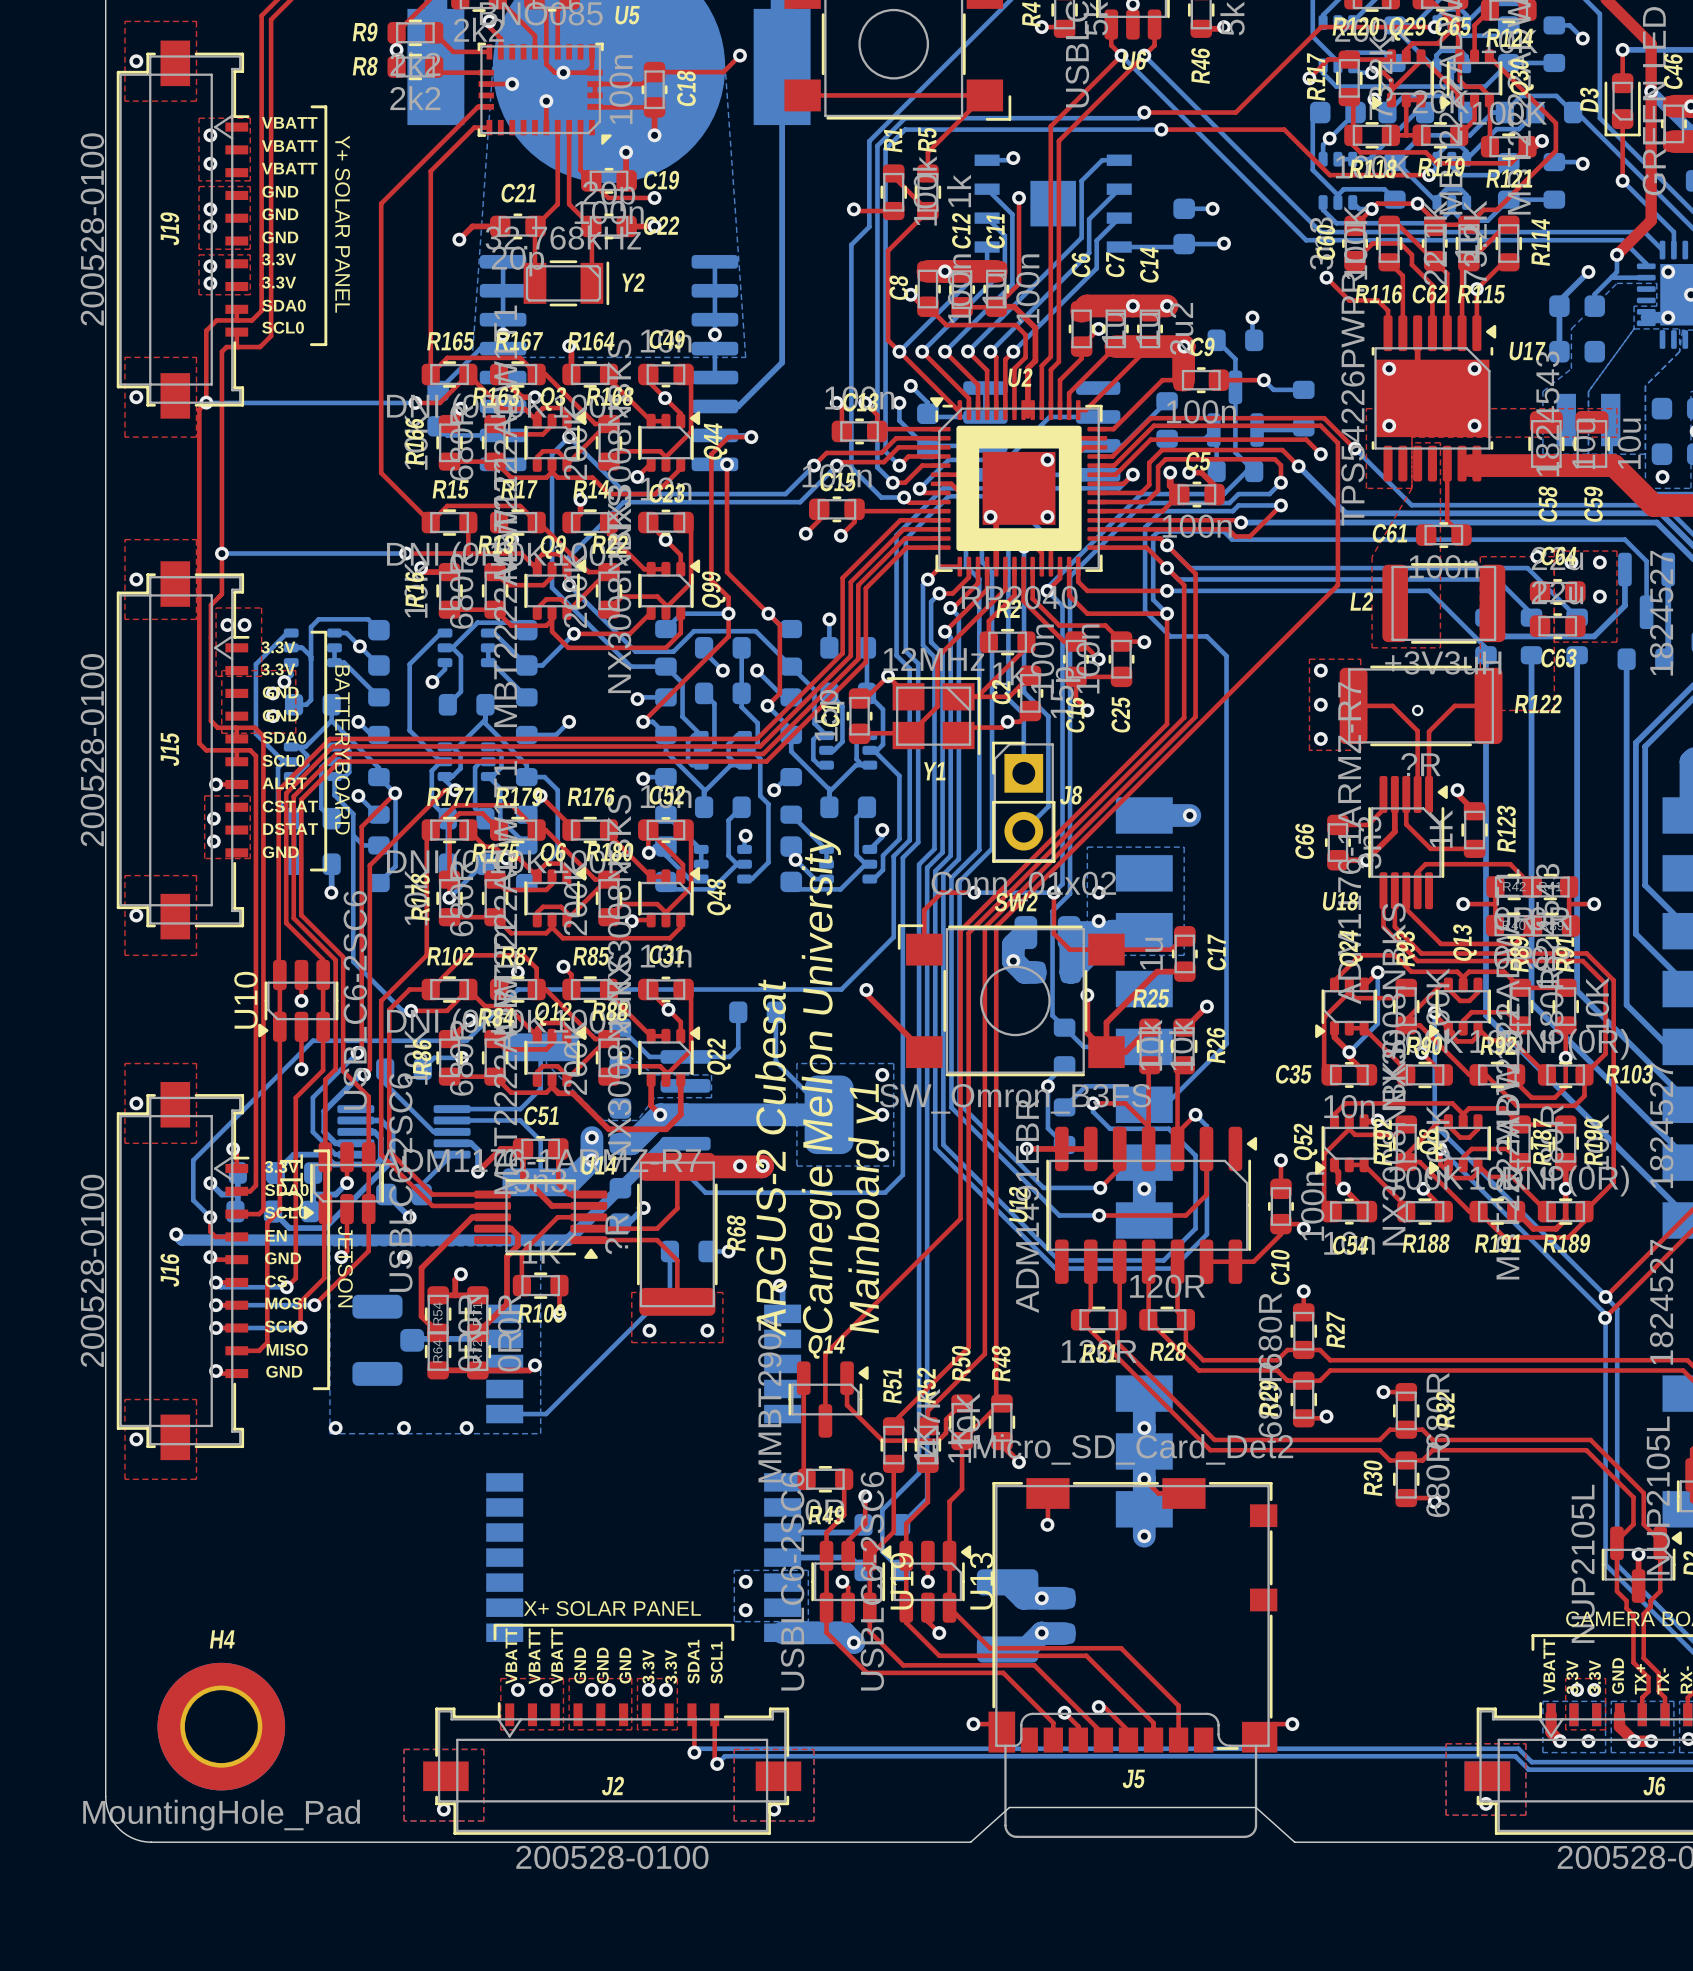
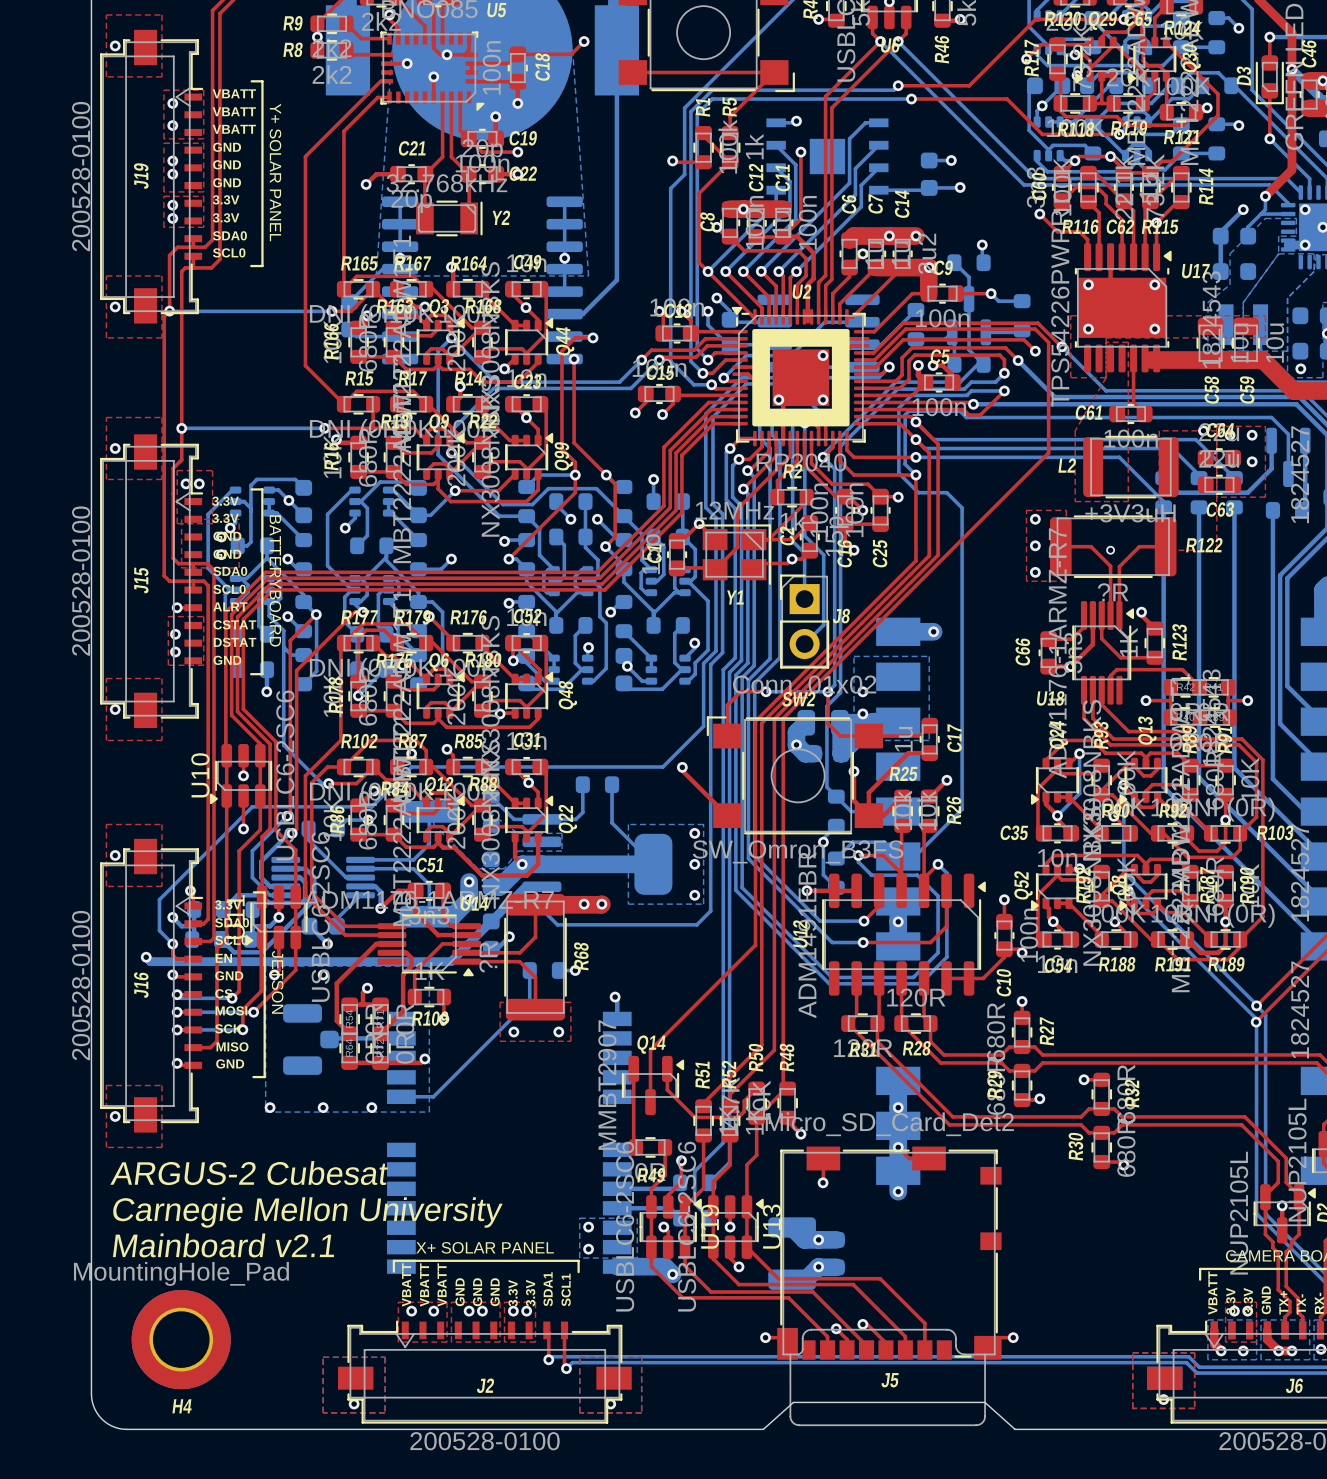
text: Carnegie Mellon University (821, 1082) -> none
text: ARGUS-2 Cubesat (770, 1158) -> none
text: Mainboard v1 (863, 1208) -> none
text: none -> ARGUS-2 Cubesat (249, 1173)
text: none -> Carnegie Mellon University (307, 1212)
text: none -> Mainboard v2.1 (223, 1245)
H4 name position: H4 (222, 1639) -> H4 (182, 1406)
H4 value position: MountingHole_Pad (221, 1815) -> MountingHole_Pad (181, 1273)

